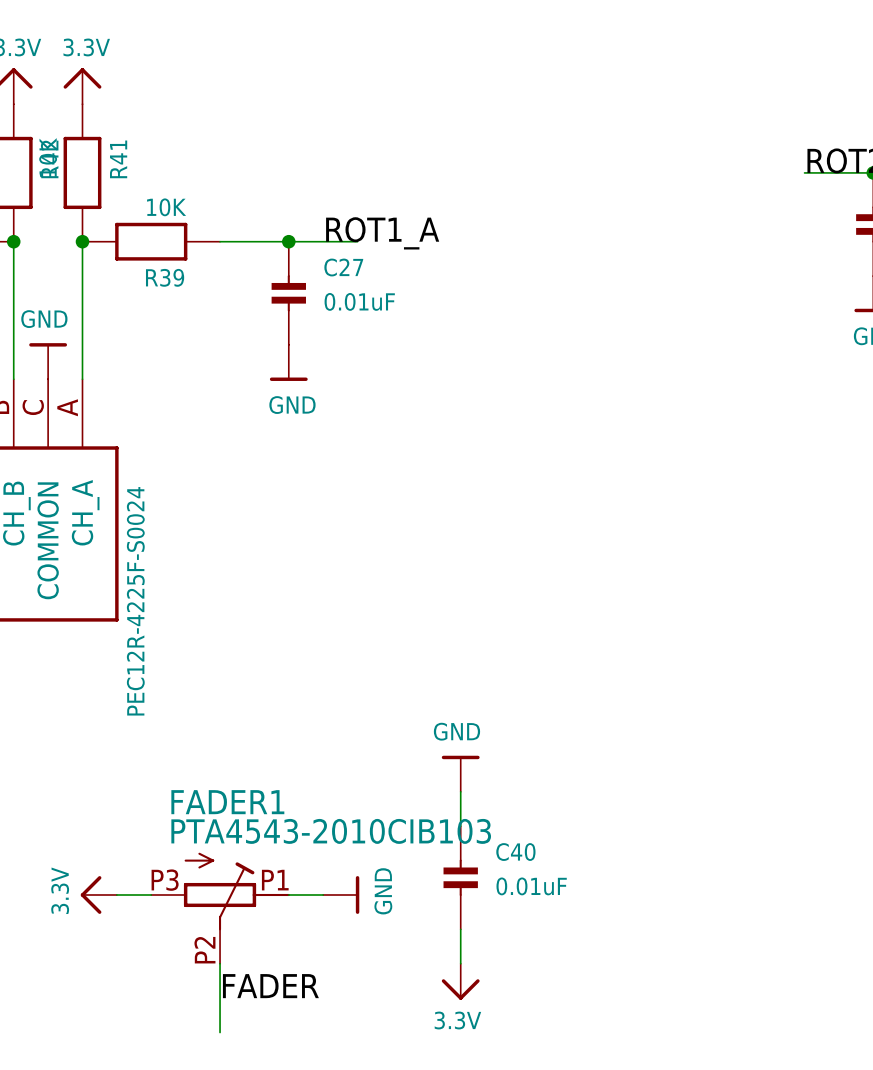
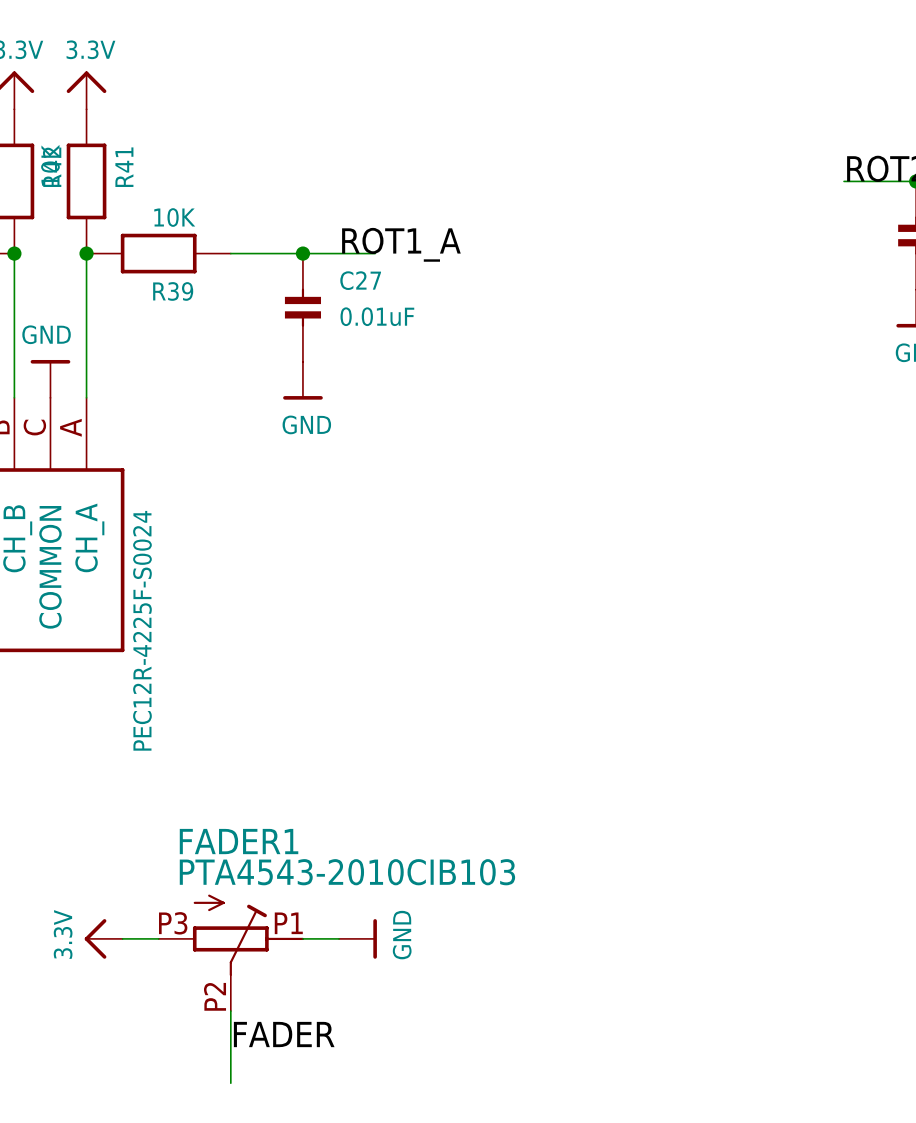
power symbol: GND (460, 773) -> none
wire: (460, 791) (460, 826) -> none
C40: 0.01uF (460, 877) -> none
wire: (460, 929) (460, 963) -> none
power symbol: 3.3V (460, 981) -> none

